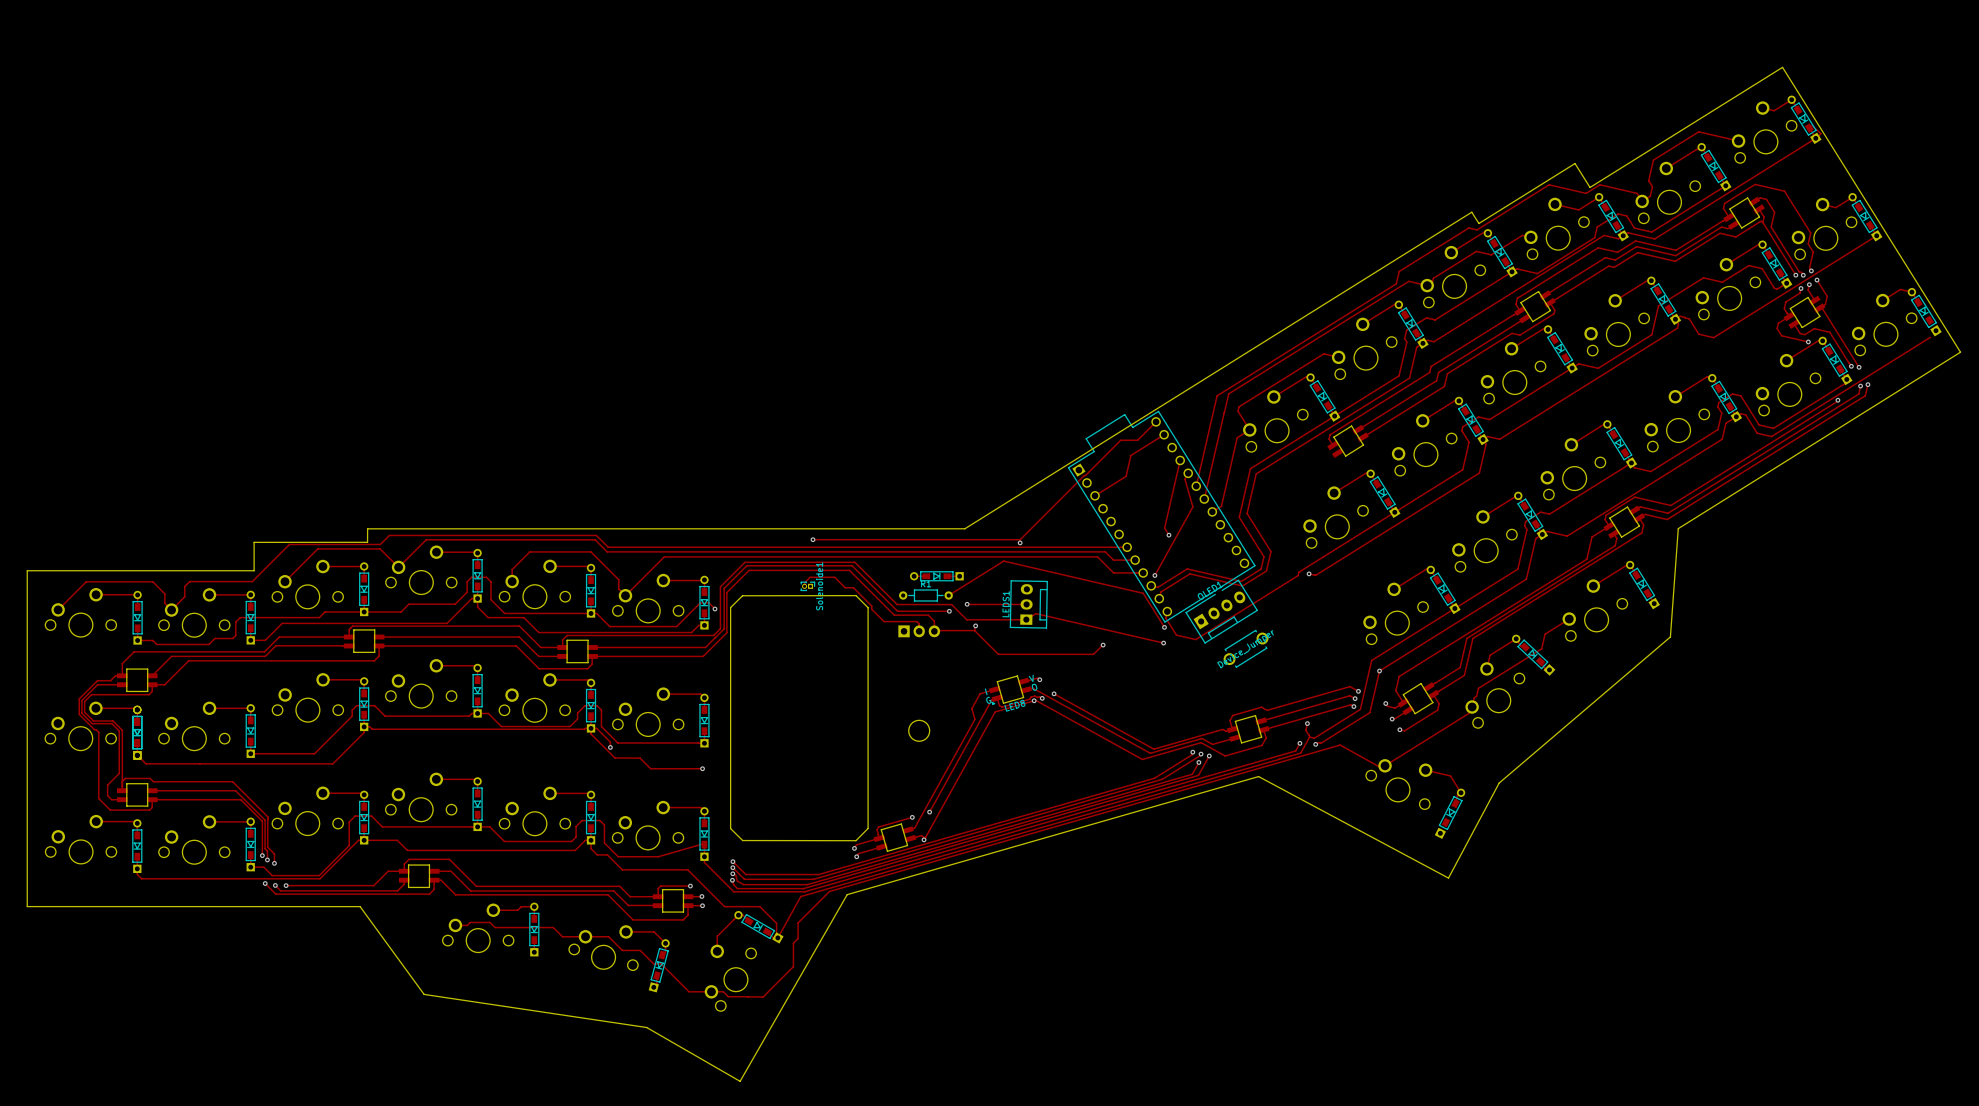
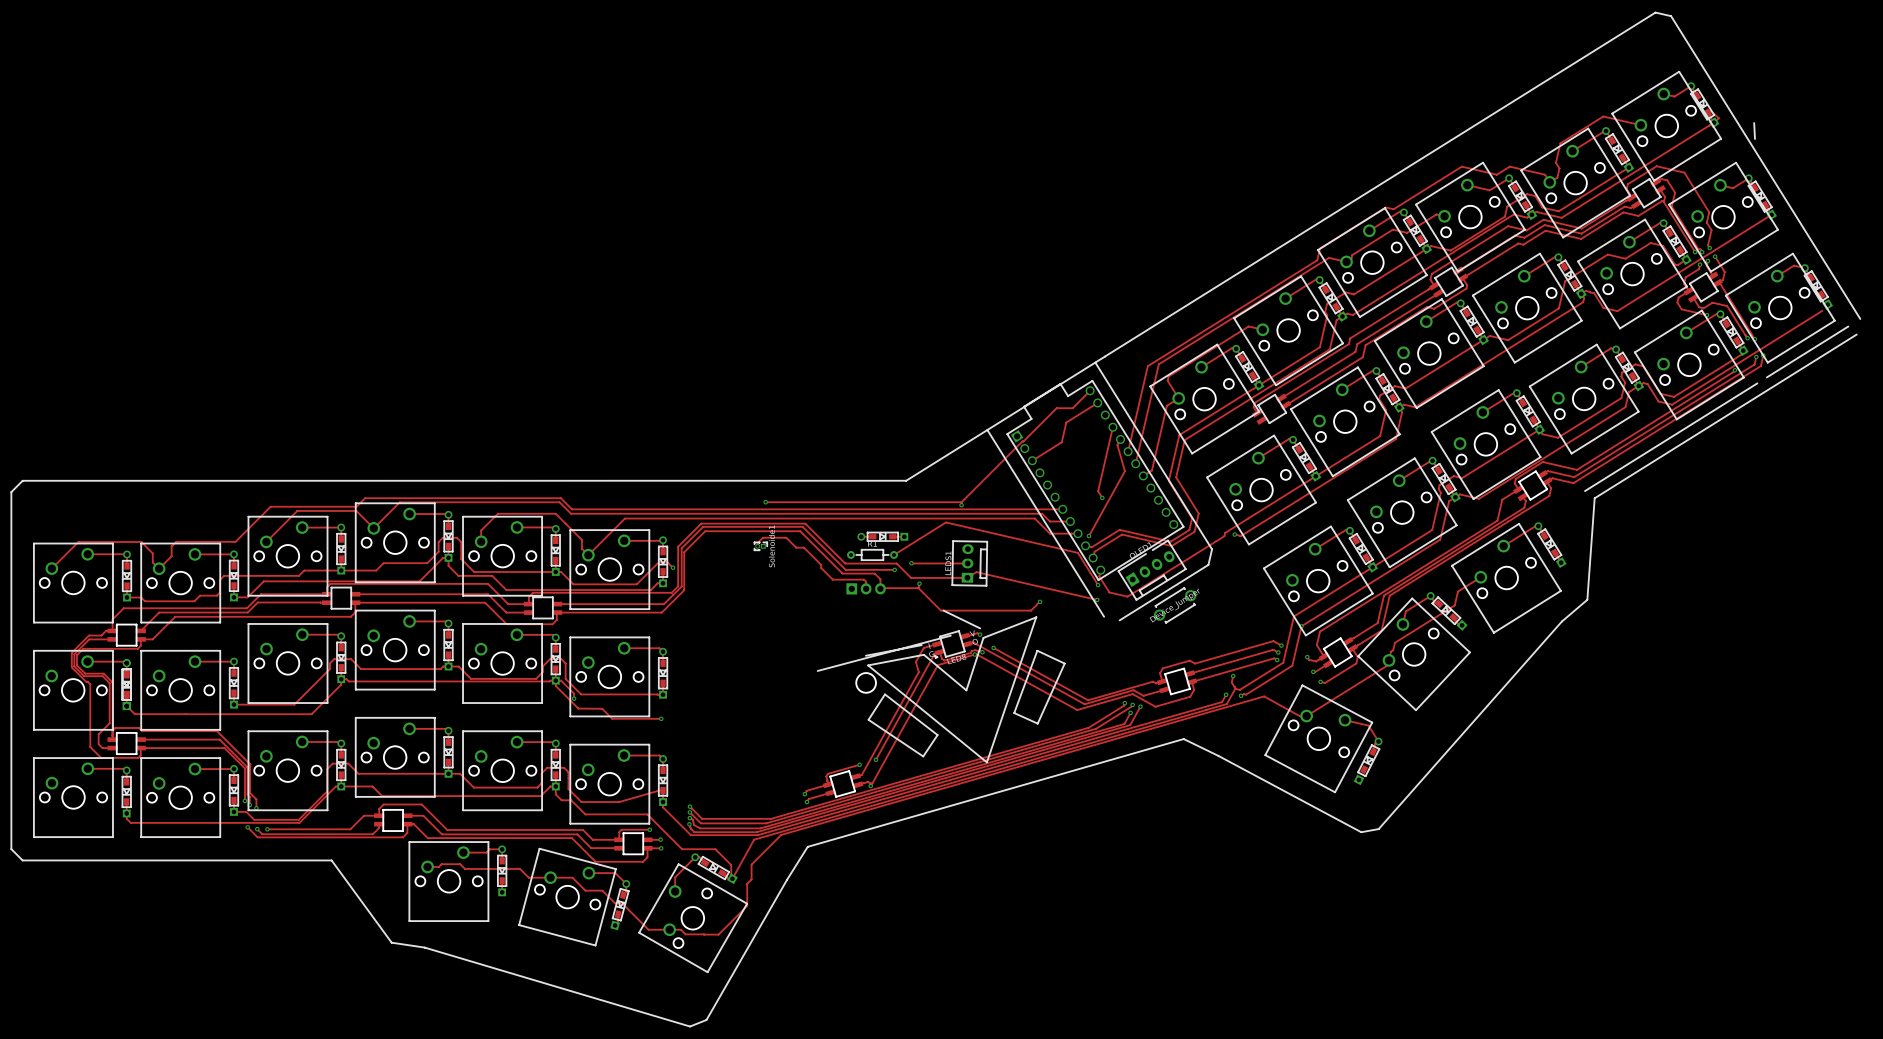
board edge: (1782, 67) (1960, 352) (1678, 528) (1670, 637) (1499, 783) (1448, 878) (1258, 776) (847, 894) (740, 1081) (646, 1027) (424, 994) (360, 906) (27, 906) (27, 570) (254, 570) (254, 542) (367, 542) (367, 528) (964, 528) (1471, 212) (1478, 223) (1575, 163) (1590, 187) (1782, 67) -> none
line: none -> (1679, 71) (1721, 138) (1654, 180) (1612, 113) (1679, 71)
line: none -> (1754, 123) (1755, 138)
line: none -> (1588, 128) (1630, 195) (1563, 237) (1521, 170) (1588, 128)
line: none -> (1483, 162) (1524, 229) (1457, 271) (1416, 204) (1483, 162)
line: none -> (1736, 162) (1669, 204) (1710, 271) (1777, 229) (1736, 162)
board edge: (1747, 197) (1729, 209) (1741, 228) (1759, 216) (1747, 197) -> none
line: none -> (1649, 179) (1632, 189) (1643, 207) (1660, 196) (1649, 179)
line: none -> (1384, 208) (1317, 250) (1359, 317) (1426, 275) (1384, 208)
line: none -> (1645, 219) (1578, 261) (1619, 328) (1686, 286) (1645, 219)
line: none -> (1539, 253) (1472, 295) (1514, 362) (1581, 320) (1539, 253)
line: none -> (1792, 253) (1834, 320) (1767, 362) (1725, 295) (1792, 253)
board edge: (1538, 291) (1520, 302) (1532, 321) (1550, 310) (1538, 291) -> none
line: none -> (1451, 267) (1435, 278) (1446, 296) (1463, 285) (1451, 267)
board edge: (1808, 297) (1790, 308) (1802, 327) (1819, 316) (1808, 297) -> none
line: none -> (1706, 273) (1689, 283) (1701, 301) (1717, 291) (1706, 273)
line: none -> (1301, 276) (1234, 318) (1275, 385) (1343, 343) (1301, 276)
line: none -> (1441, 299) (1483, 366) (1416, 408) (1374, 341) (1441, 299)
line: none -> (1701, 310) (1743, 377) (1676, 419) (1634, 352) (1701, 310)
line: none -> (1860, 318) (1671, 16) (1655, 12) (906, 480) (22, 480) (11, 492) (11, 849) (22, 860) (331, 860) (391, 942) (424, 947) (690, 1026) (706, 1019) (807, 846) (1183, 739) (1361, 832) (1378, 829) (1561, 621) (1587, 599) (1594, 498) (1856, 334)
line: none -> (1848, 326) (1766, 377)
line: none -> (1217, 344) (1150, 386) (1192, 453) (1259, 411) (1217, 344)
line: none -> (1596, 344) (1638, 411) (1571, 453) (1529, 386) (1596, 344)
line: none -> (1095, 362) (1212, 549) (1208, 564) (1119, 620)
line: none -> (1357, 367) (1290, 409) (1332, 476) (1399, 434) (1357, 367)
line: none -> (1757, 383) (1585, 491)
line: none -> (1498, 390) (1540, 457) (1473, 499) (1431, 431) (1498, 390)
board edge: (1351, 426) (1333, 437) (1345, 456) (1363, 445) (1351, 426) -> none
line: none -> (1275, 394) (1258, 405) (1269, 423) (1286, 412) (1275, 394)
line: none -> (987, 430) (1104, 616)
line: none -> (1274, 435) (1207, 477) (1248, 544) (1315, 502) (1274, 435)
line: none -> (1414, 458) (1456, 525) (1389, 567) (1347, 500) (1414, 458)
line: none -> (355, 503) (355, 582) (434, 582) (434, 503) (355, 503)
line: none -> (248, 516) (327, 516) (327, 595) (248, 595) (248, 516)
line: none -> (463, 516) (463, 595) (542, 595) (542, 516) (463, 516)
line: none -> (1519, 523) (1451, 565) (1493, 632) (1560, 590) (1519, 523)
line: none -> (1330, 526) (1372, 593) (1305, 635) (1263, 568) (1330, 526)
line: none -> (570, 530) (649, 530) (649, 609) (570, 609) (570, 530)
line: none -> (33, 543) (112, 543) (112, 622) (33, 622) (33, 543)
line: none -> (141, 543) (220, 543) (220, 622) (141, 622) (141, 543)
board edge: (855, 595) (742, 595) (730, 607) (730, 828) (742, 840) (855, 840) (868, 828) (868, 607) (855, 595) -> none
board edge: (353, 629) (374, 629) (374, 652) (353, 652) (353, 629) -> none
line: none -> (331, 587) (351, 587) (351, 608) (331, 608) (331, 587)
board edge: (567, 640) (587, 640) (587, 662) (567, 662) (567, 640) -> none
line: none -> (533, 597) (552, 597) (552, 618) (533, 618) (533, 597)
line: none -> (1412, 598) (1469, 652) (1415, 710) (1358, 656) (1412, 598)
line: none -> (355, 610) (355, 689) (434, 689) (434, 610) (355, 610)
line: none -> (943, 610) (980, 628)
line: none -> (1036, 617) (986, 762) (868, 665) (923, 654) (966, 690) (983, 637) (1036, 617)
line: none -> (248, 623) (248, 703) (327, 703) (327, 623) (248, 623)
line: none -> (463, 623) (463, 703) (542, 703) (542, 623) (463, 623)
board edge: (1017, 675) (997, 681) (1003, 703) (1023, 697) (1017, 675) -> none
line: none -> (959, 631) (940, 636) (945, 656) (964, 651) (959, 631)
line: none -> (950, 635) (817, 670)
line: none -> (570, 637) (570, 716) (649, 716) (649, 637) (570, 637)
line: none -> (921, 645) (865, 655)
line: none -> (33, 650) (33, 729) (112, 729) (112, 650) (33, 650)
line: none -> (141, 650) (141, 729) (220, 729) (220, 650) (141, 650)
line: none -> (1037, 650) (1064, 663) (1037, 723) (1014, 713) (1037, 650)
line: none -> (1302, 685) (1372, 722) (1335, 792) (1265, 755) (1302, 685)
line: none -> (885, 694) (868, 719) (923, 756) (937, 735) (885, 694)
line: none -> (355, 717) (355, 796) (434, 796) (434, 717) (355, 717)
line: none -> (248, 731) (248, 810) (327, 810) (327, 731) (248, 731)
line: none -> (463, 731) (463, 810) (542, 810) (542, 731) (463, 731)
line: none -> (570, 744) (570, 823) (649, 823) (649, 744) (570, 744)
line: none -> (33, 758) (33, 837) (112, 837) (112, 758) (33, 758)
line: none -> (141, 758) (141, 837) (220, 837) (220, 758) (141, 758)
line: none -> (409, 842) (488, 842) (488, 921) (409, 921) (409, 842)
line: none -> (539, 848) (519, 925) (595, 945) (615, 869) (539, 848)
line: none -> (678, 864) (747, 903) (707, 972) (639, 932) (678, 864)

